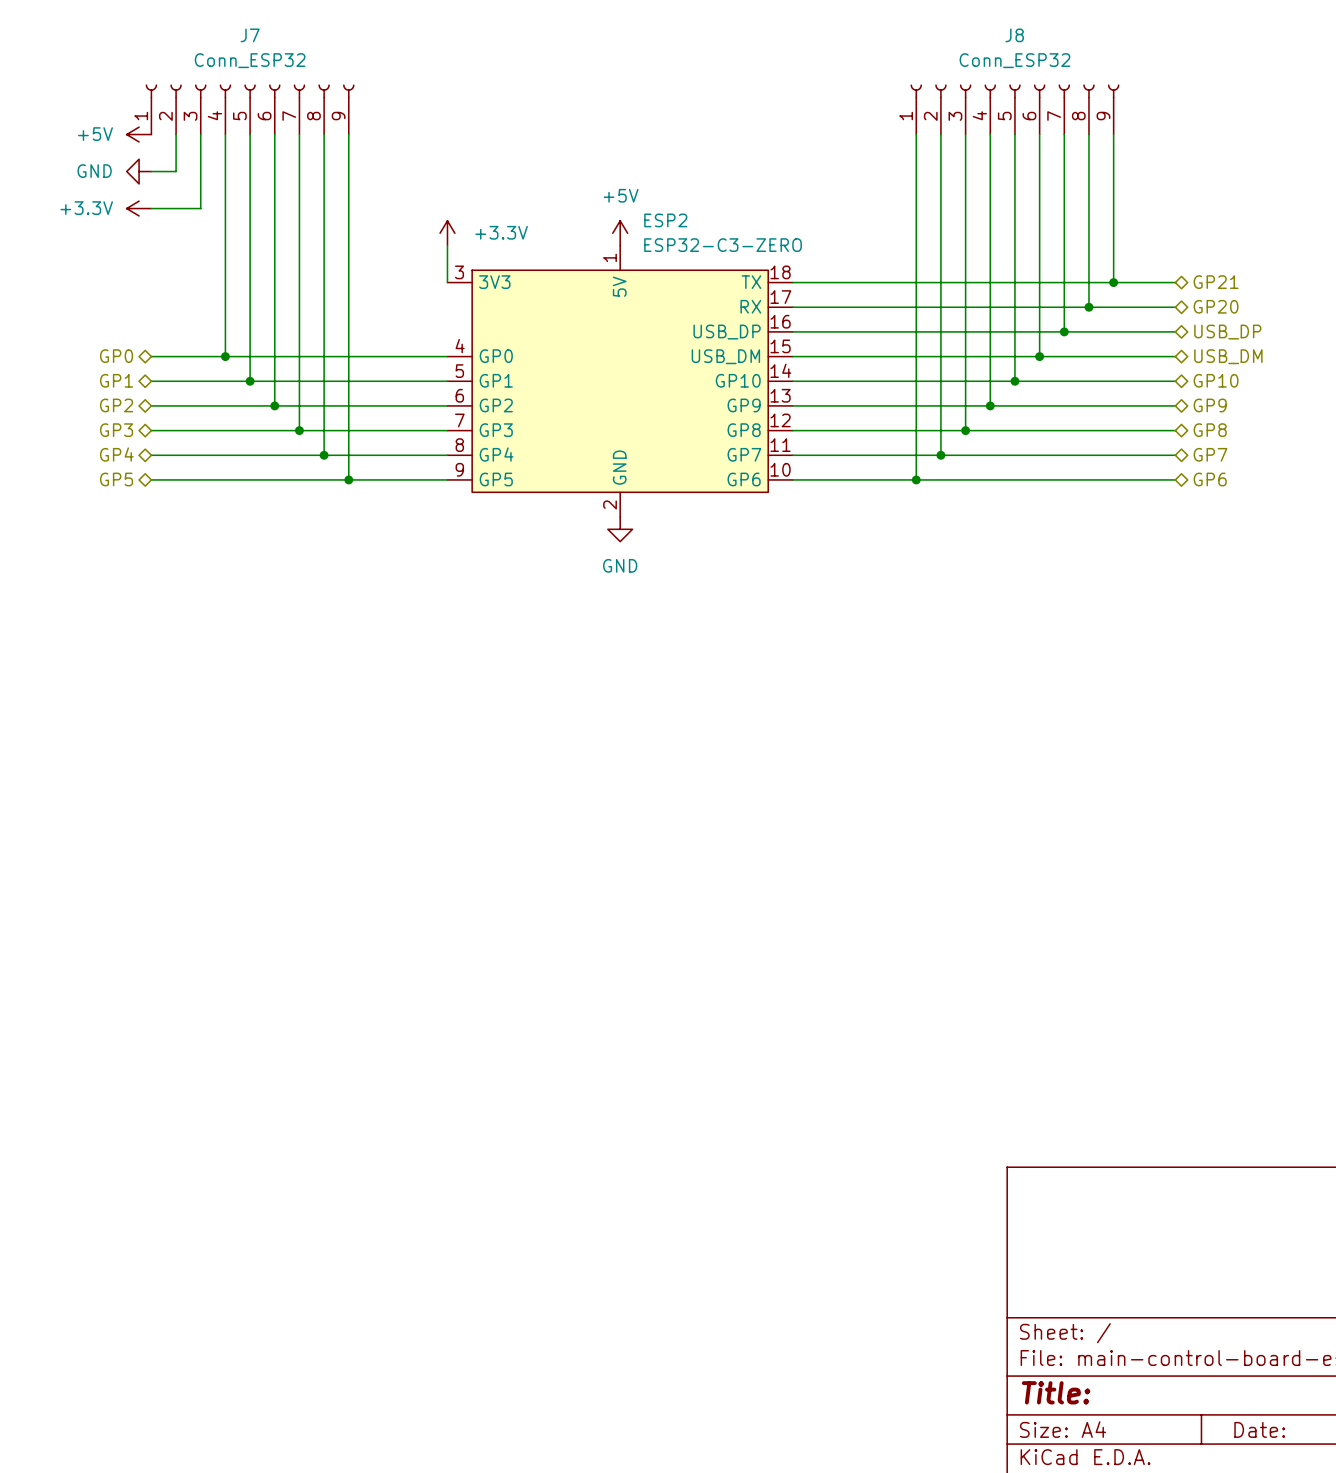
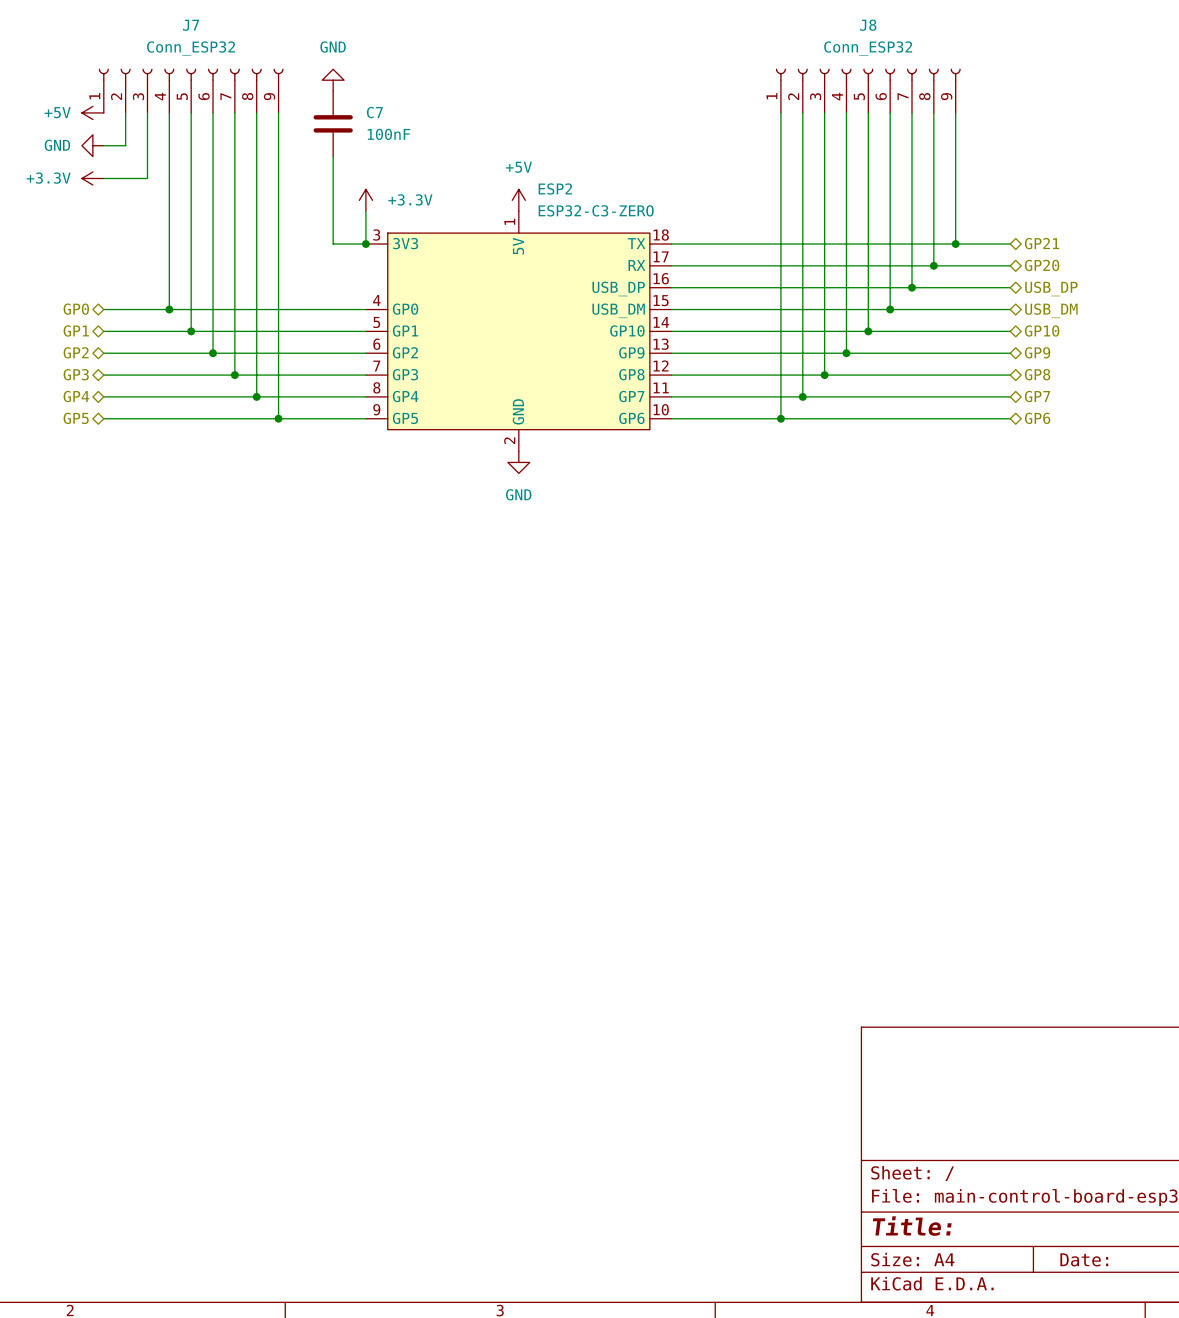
power symbol: none -> GND (333, 80)
C7: none -> 100nF (333, 123)
wire: none -> (333, 156) (333, 244) (365, 244)
junction: none -> (365, 244)

